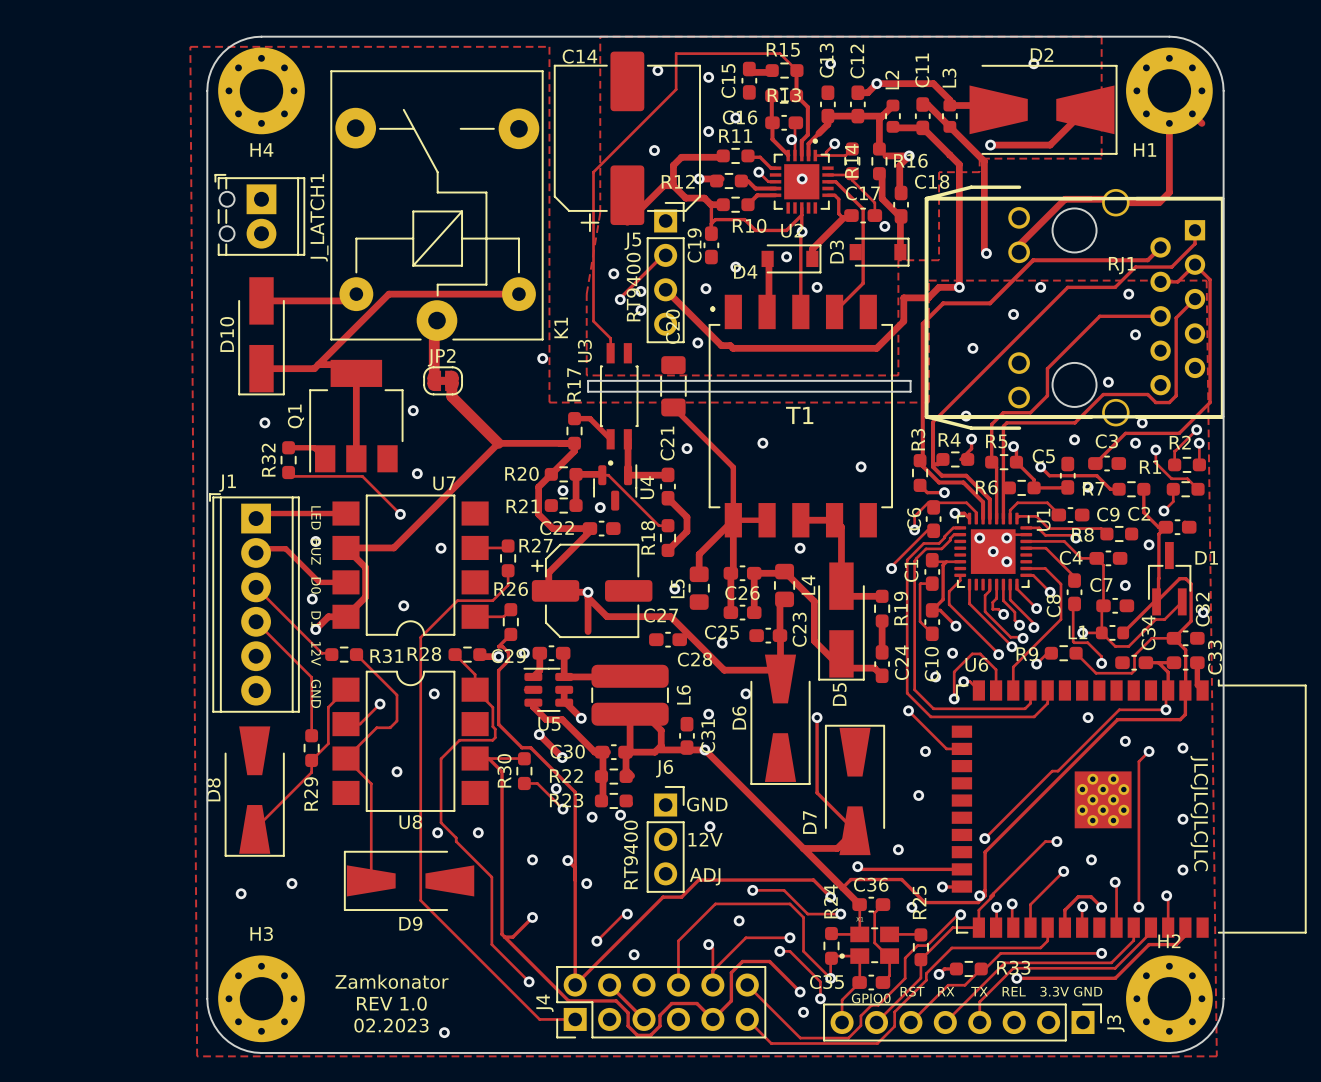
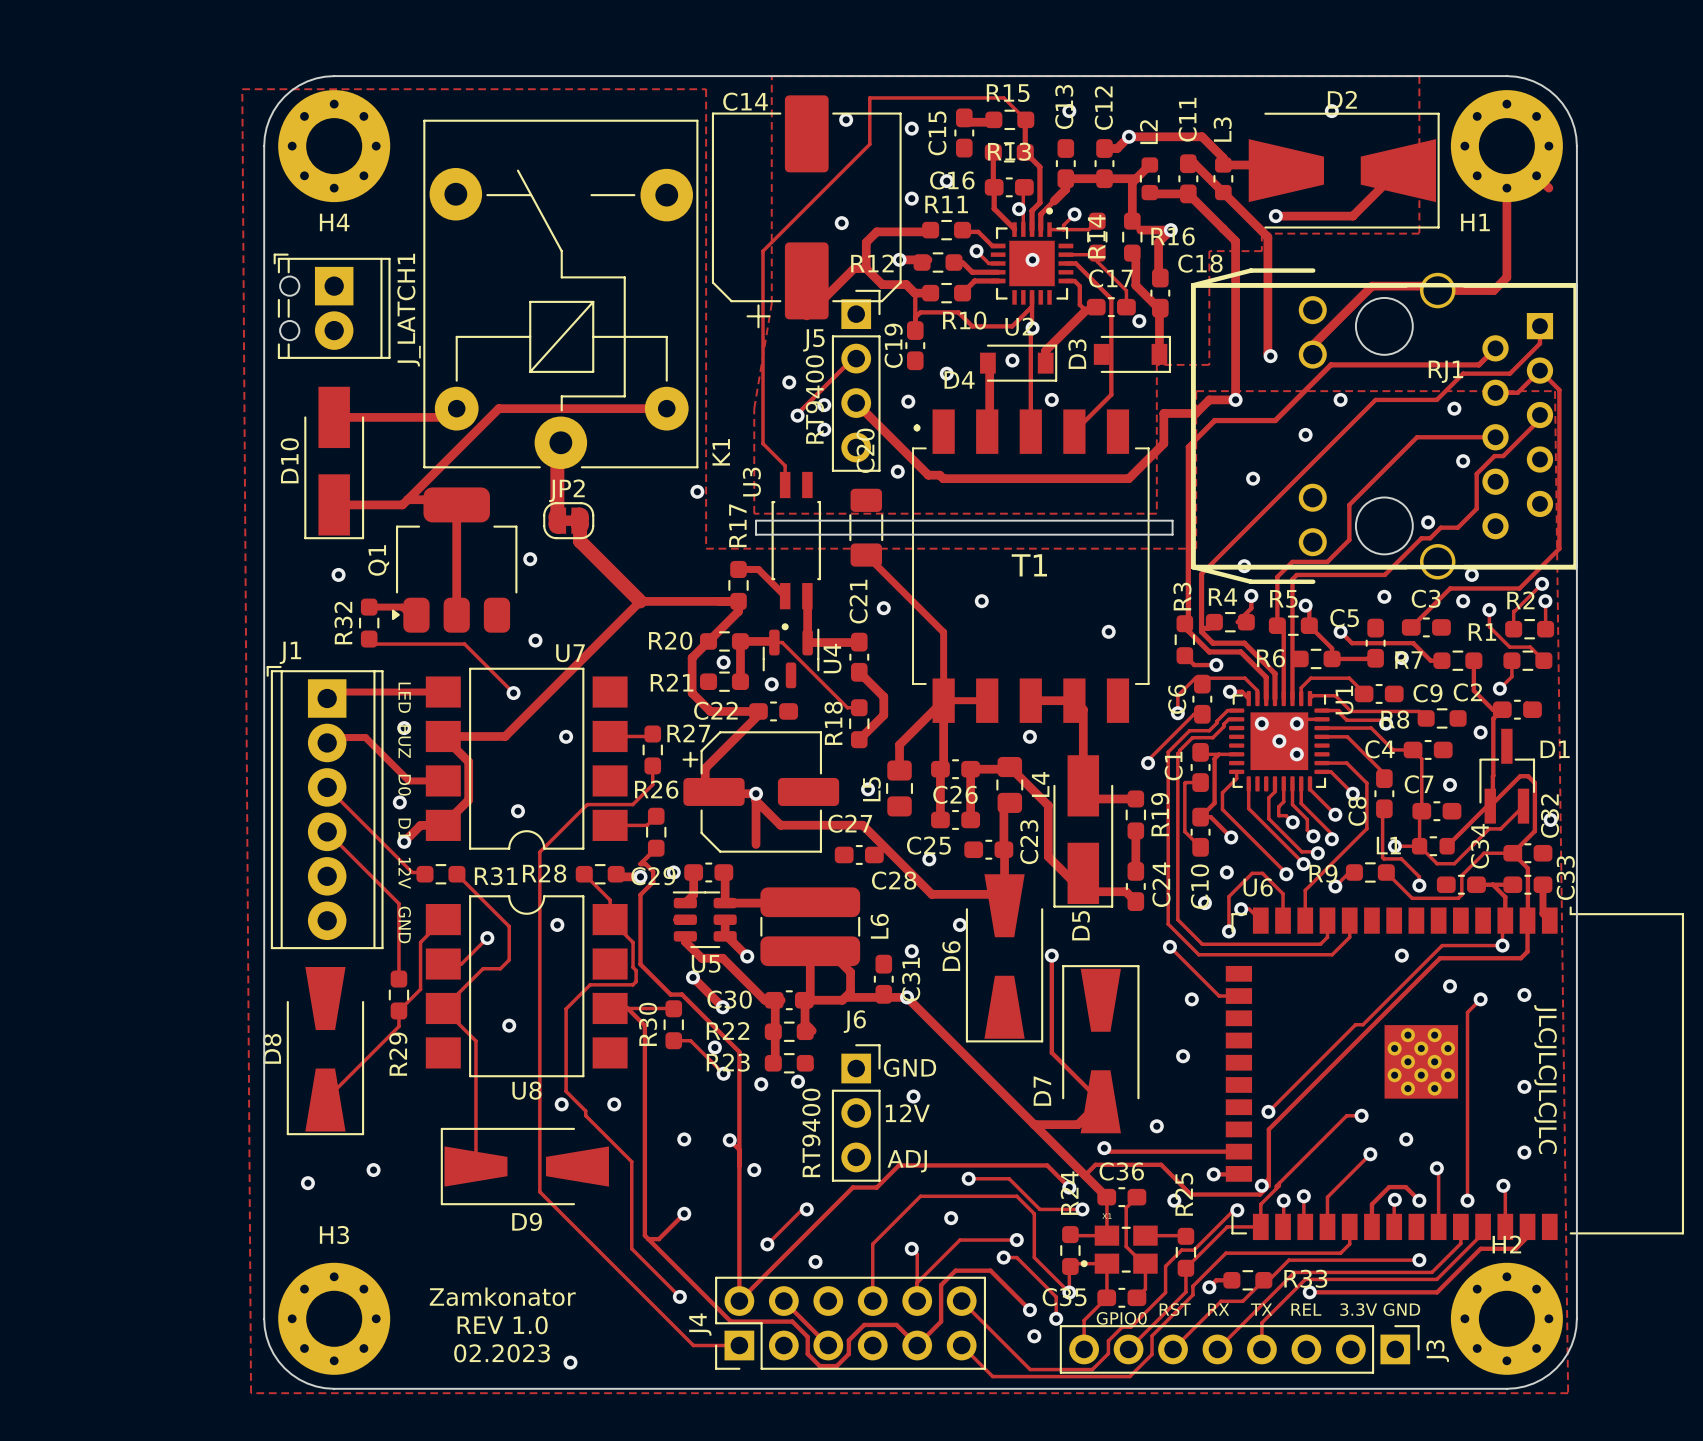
track: (1195, 299) (1176, 317) (1176, 395) (1169, 402) (1155, 402) (1147, 394) (1110, 394) -> (1539, 415) (1539, 419) (1503, 456) (1494, 456) (1476, 473) (1476, 508) (1457, 527) (1440, 527) (1430, 538)
Q1 footprint: [309, 359, 404, 473] -> [391, 487, 518, 633]

